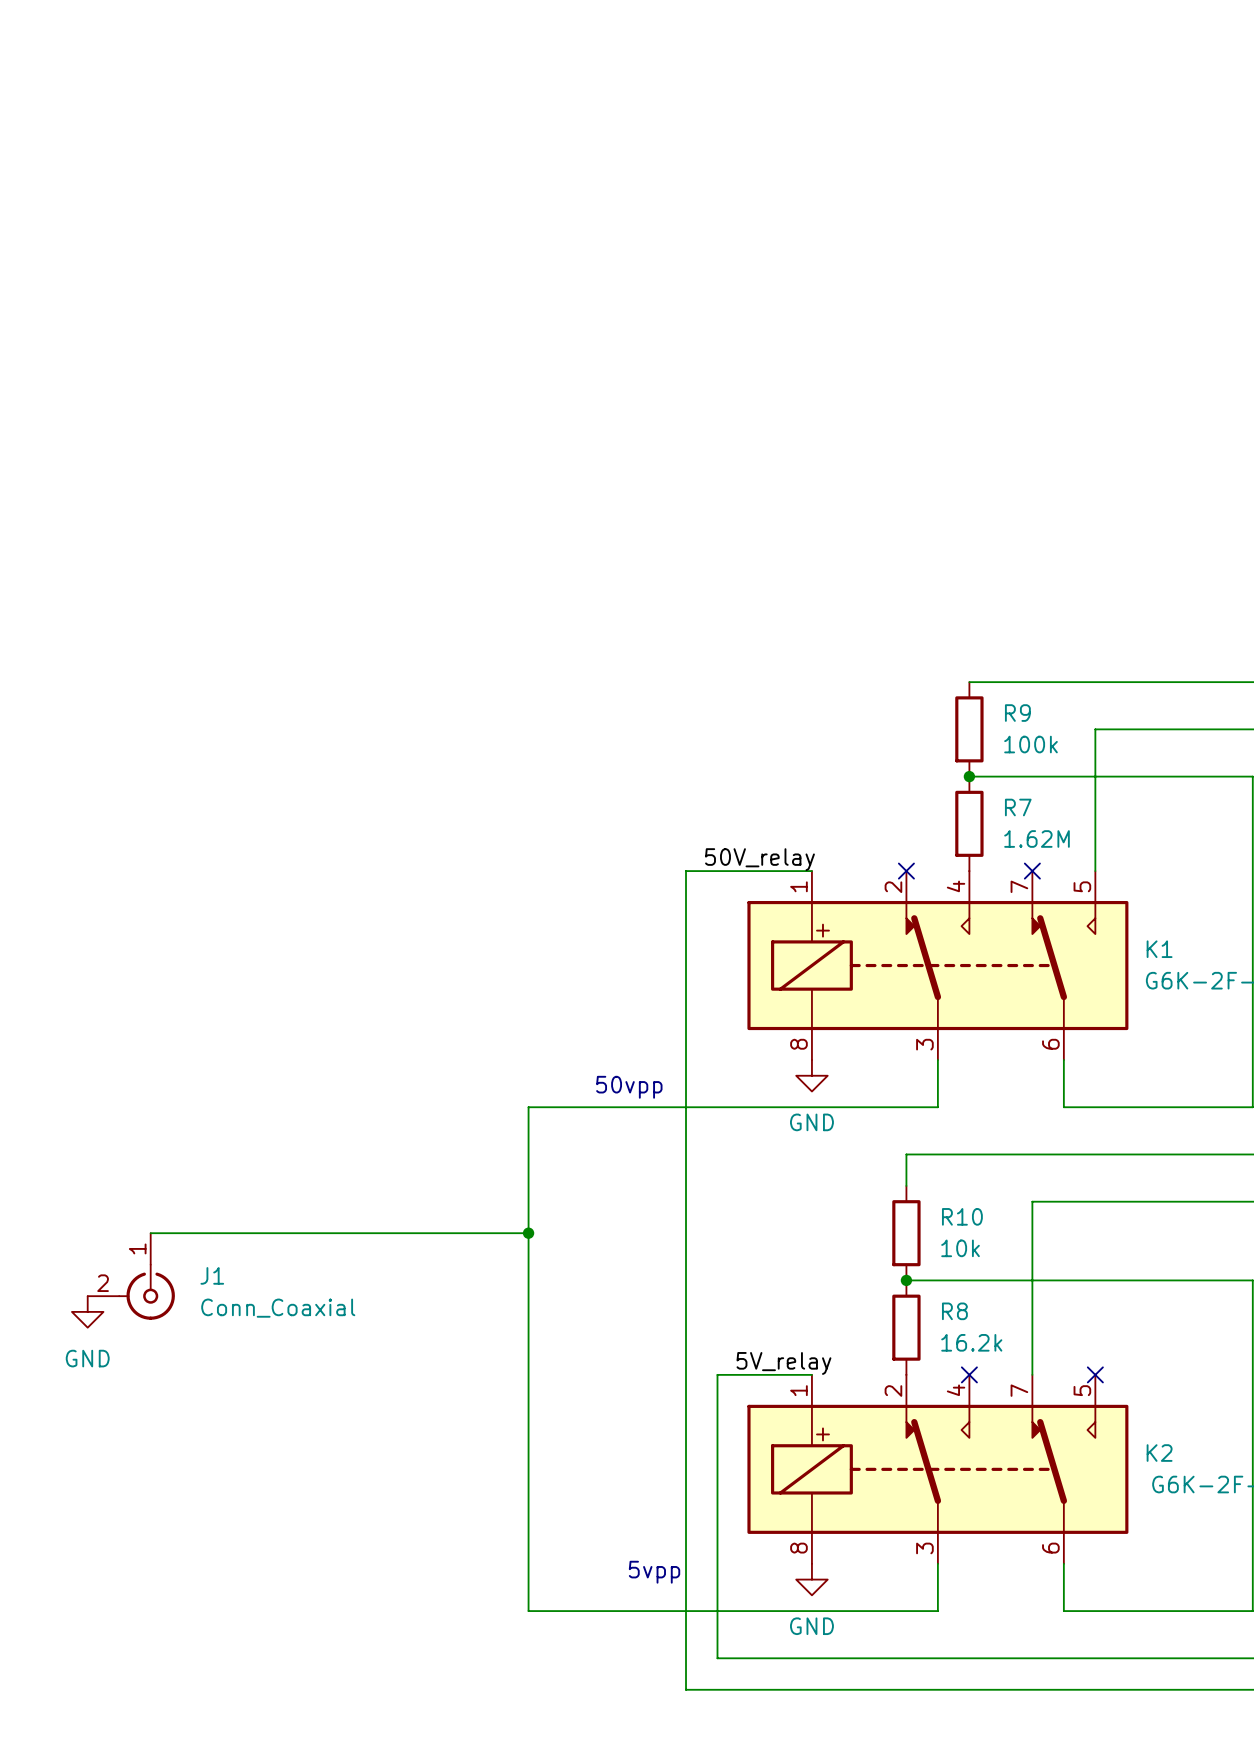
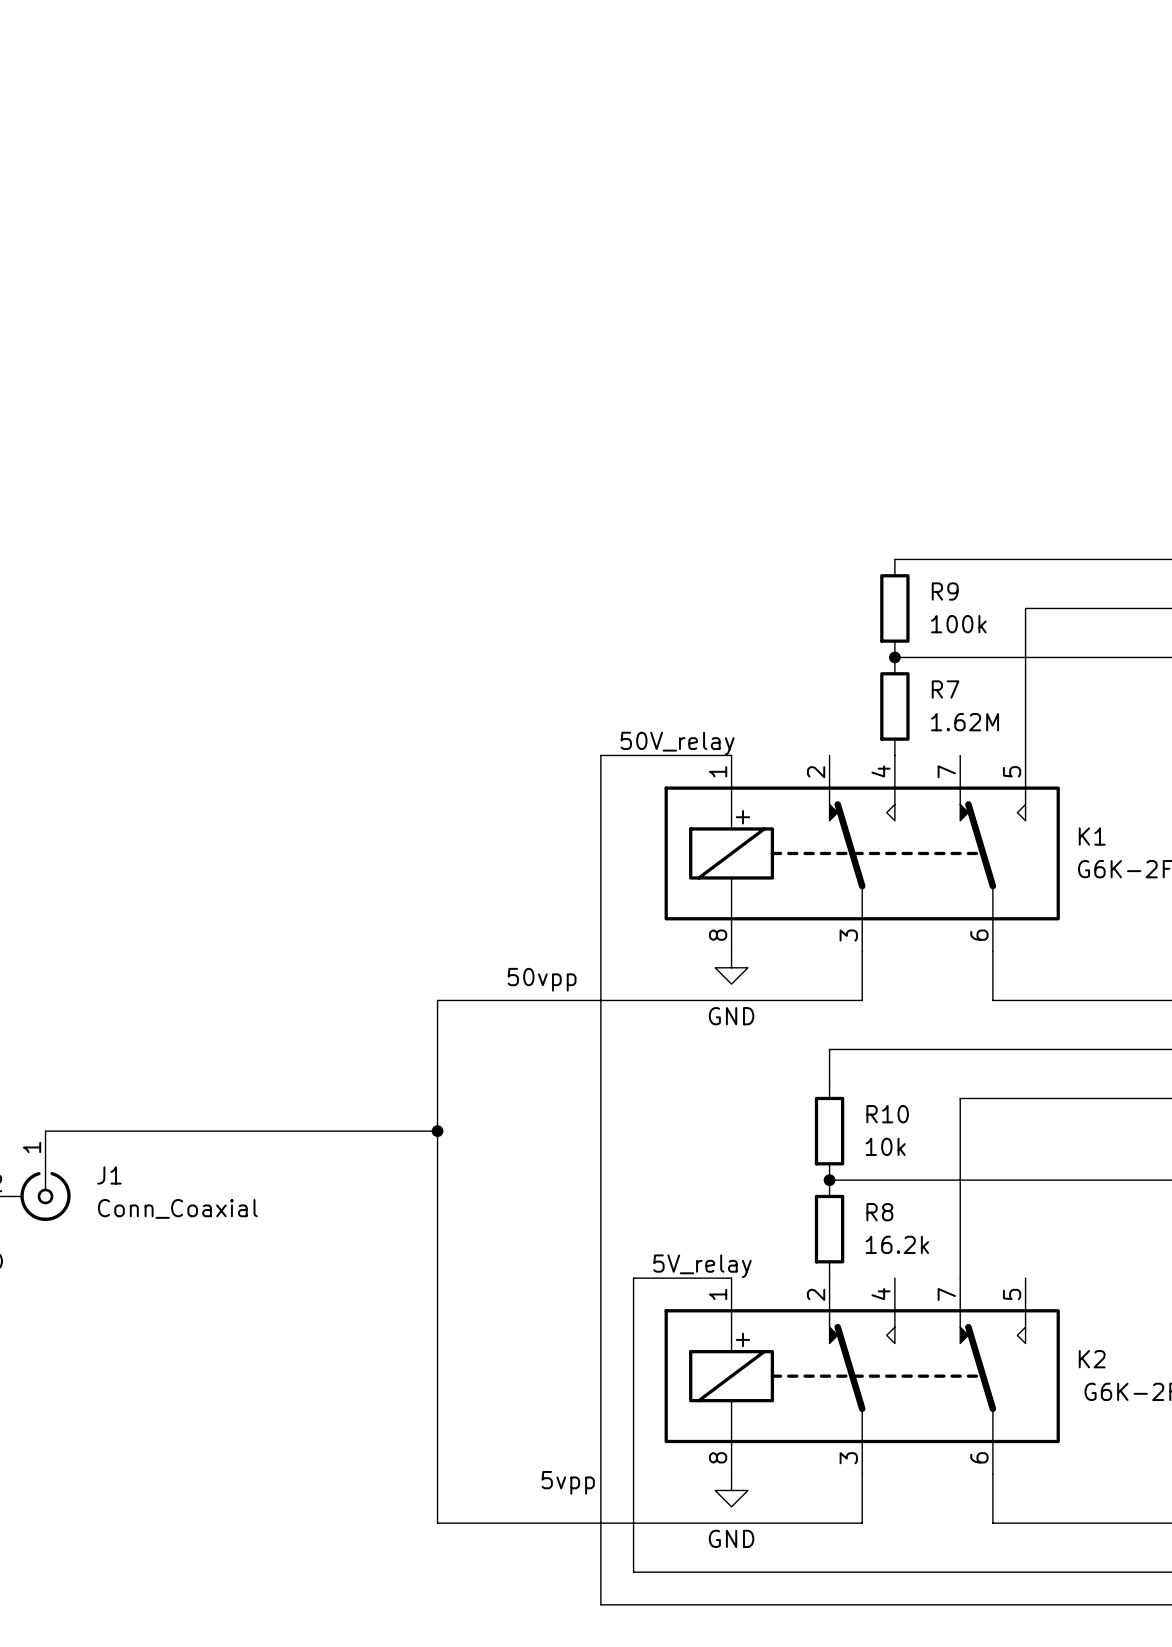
no-connect mark: (906, 871) -> none
no-connect mark: (1032, 871) -> none
no-connect mark: (969, 1374) -> none
no-connect mark: (1095, 1374) -> none

